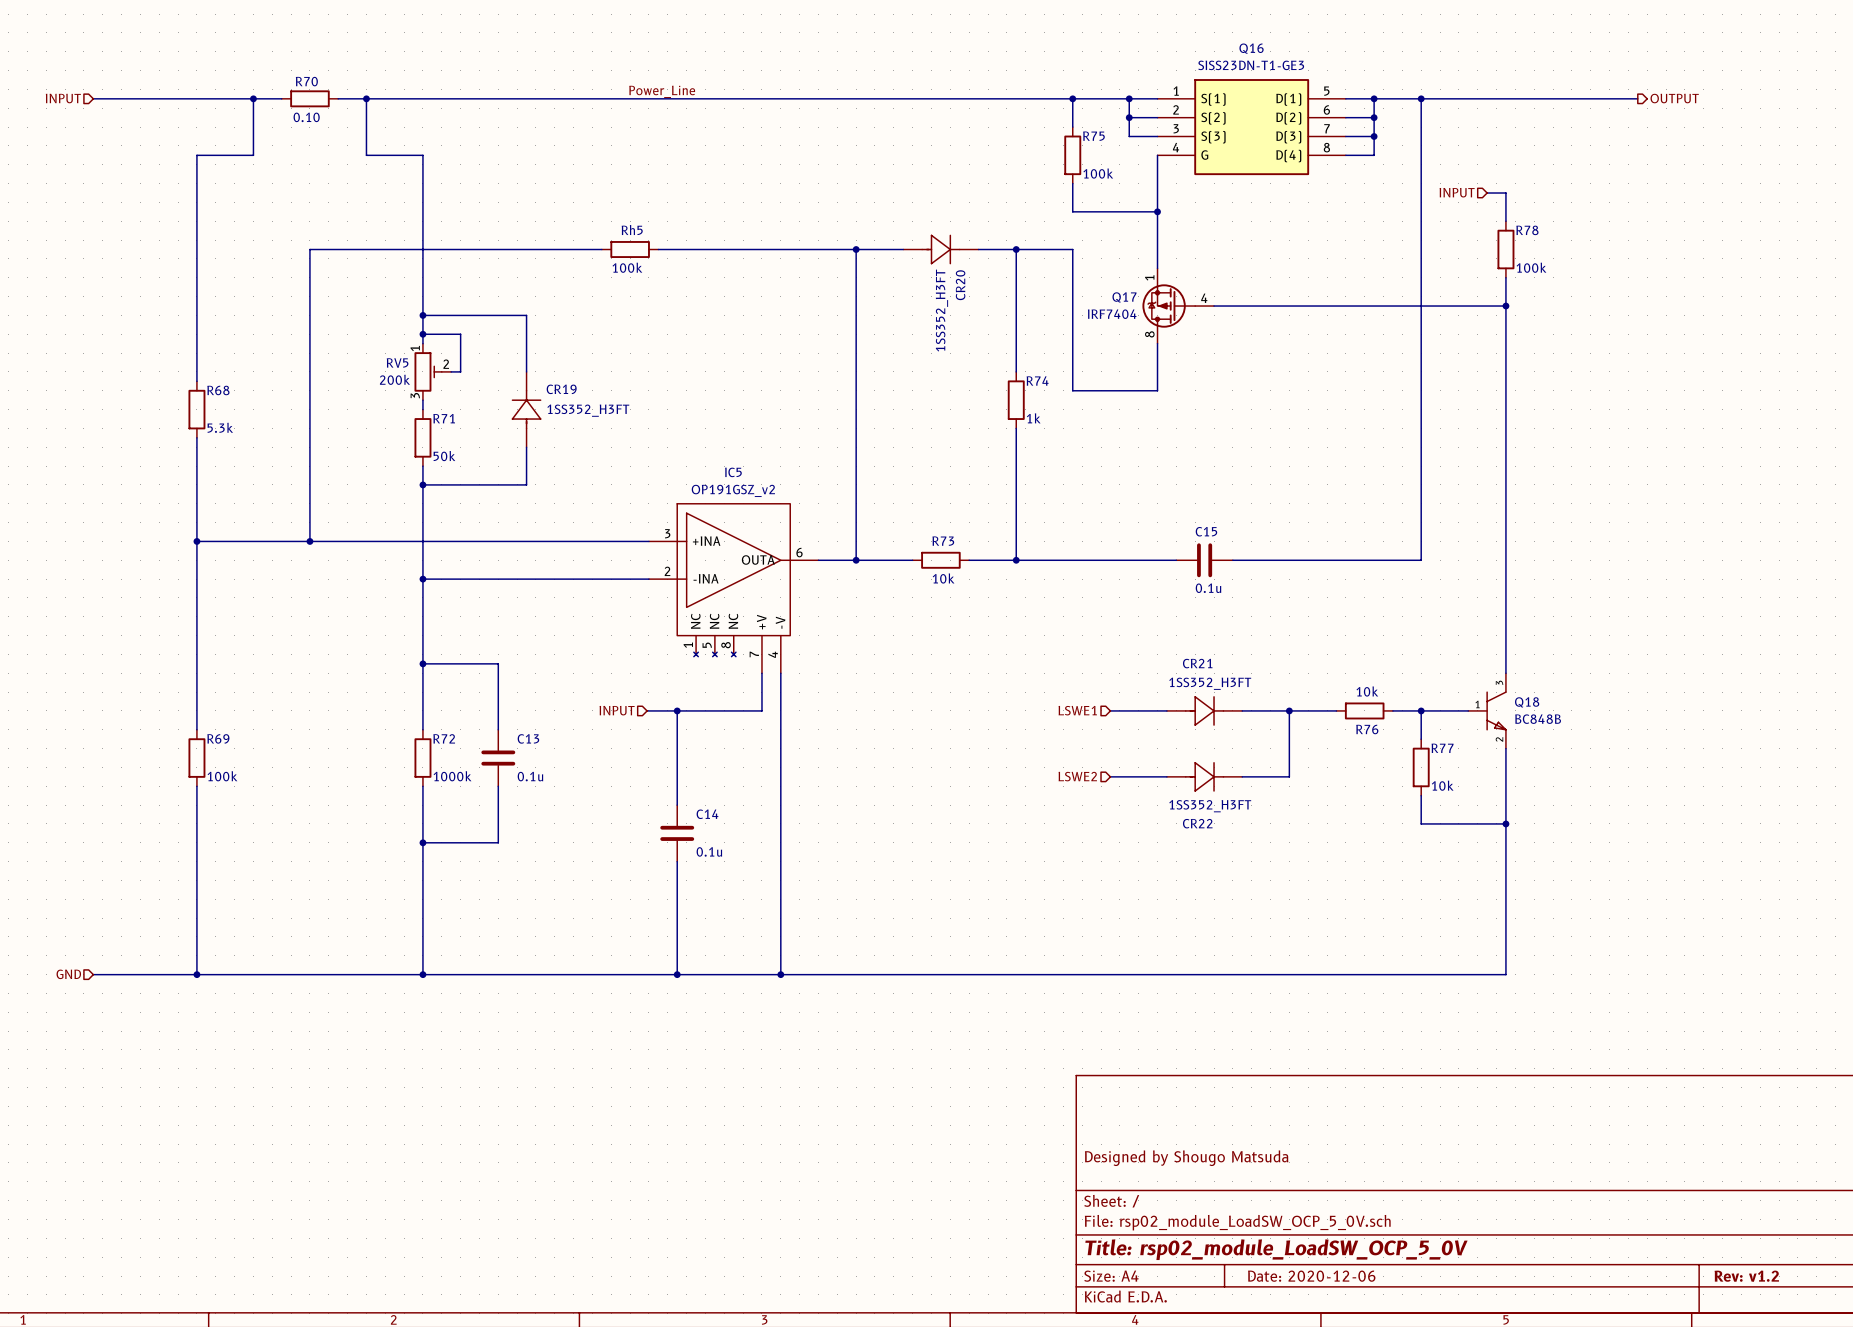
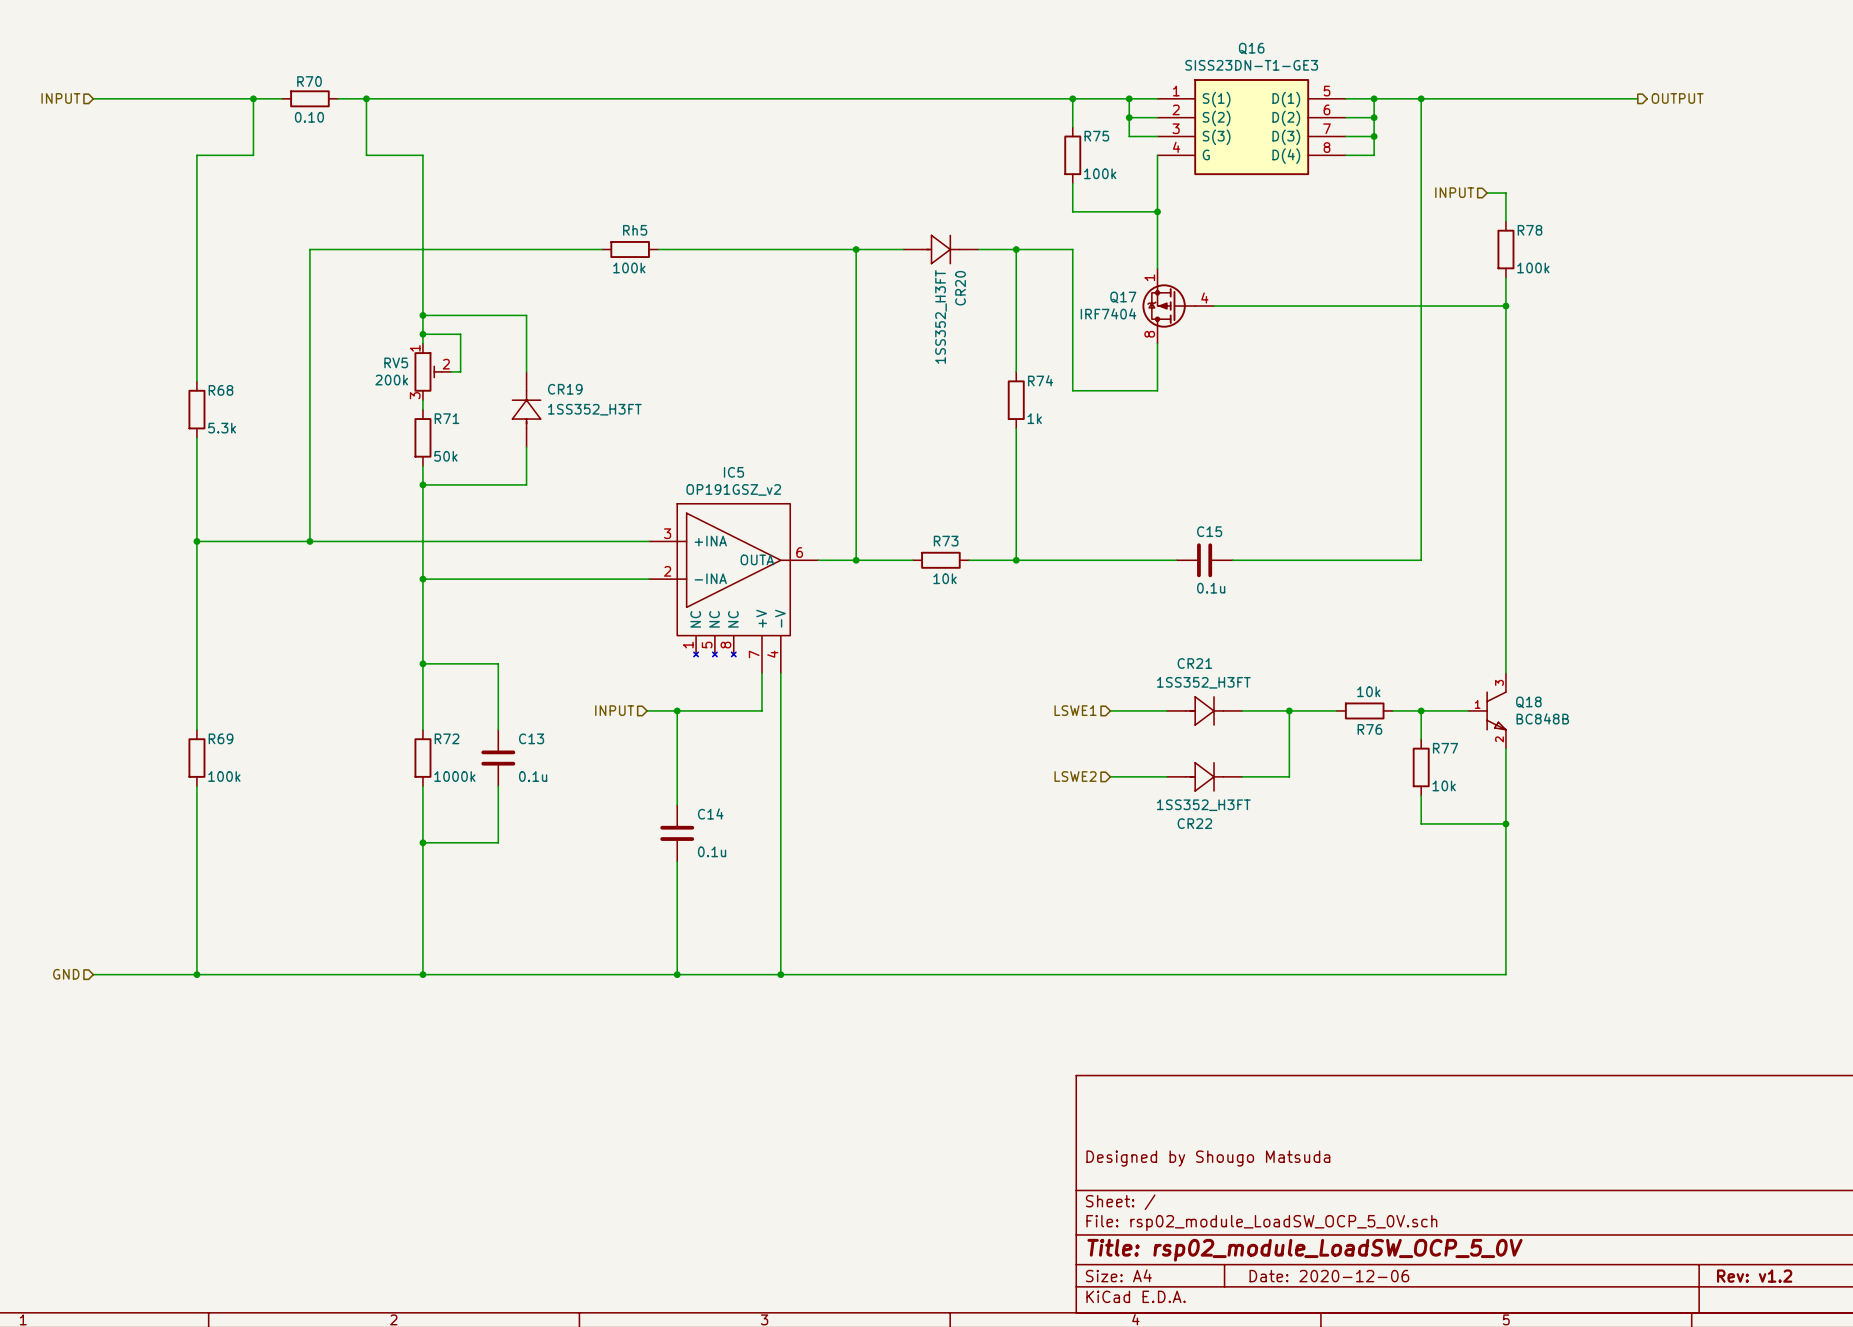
label: Power_Line (662, 91) -> none

